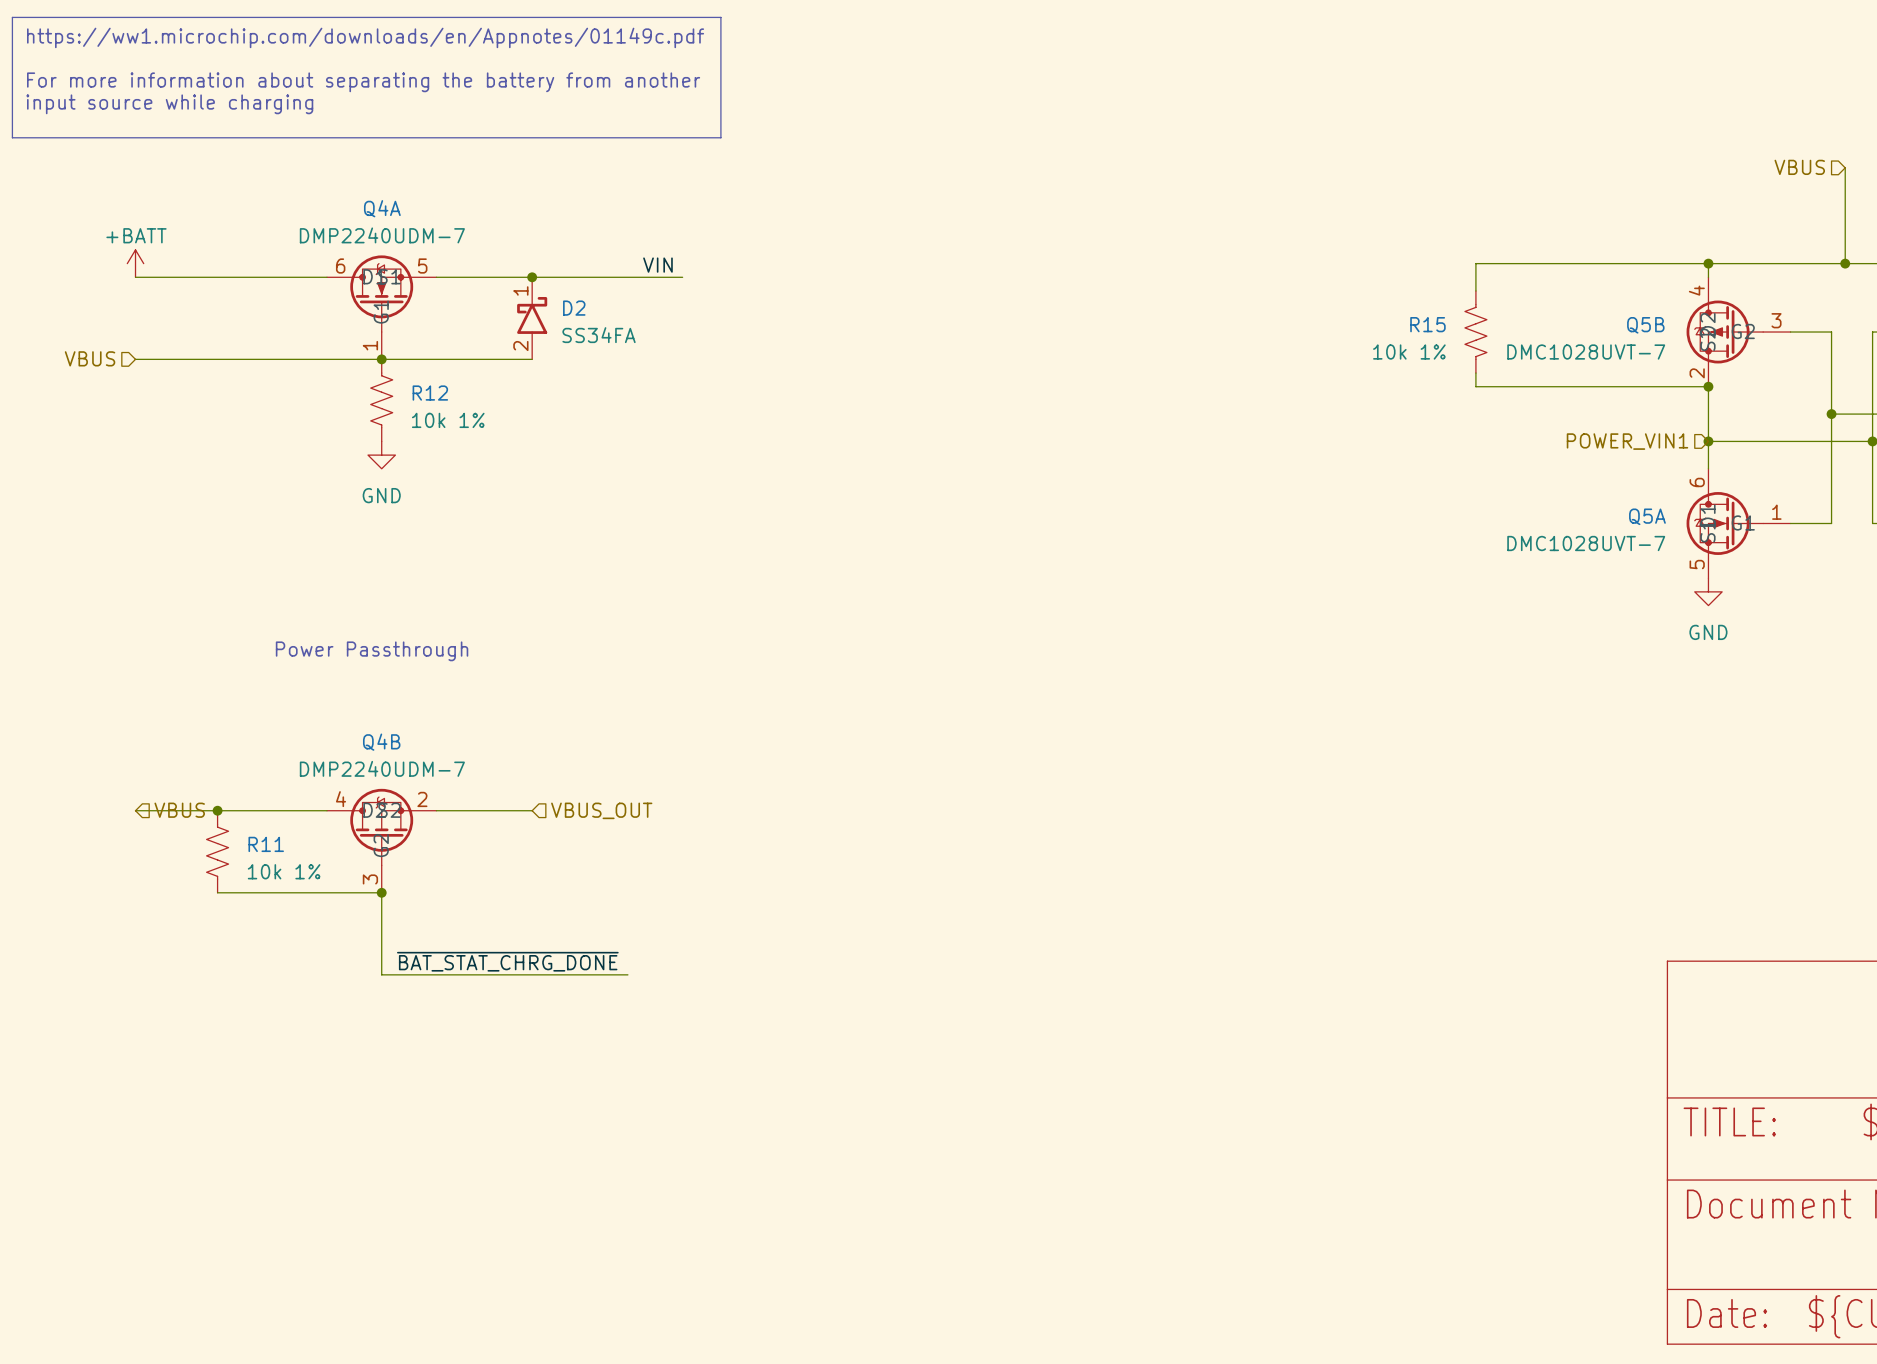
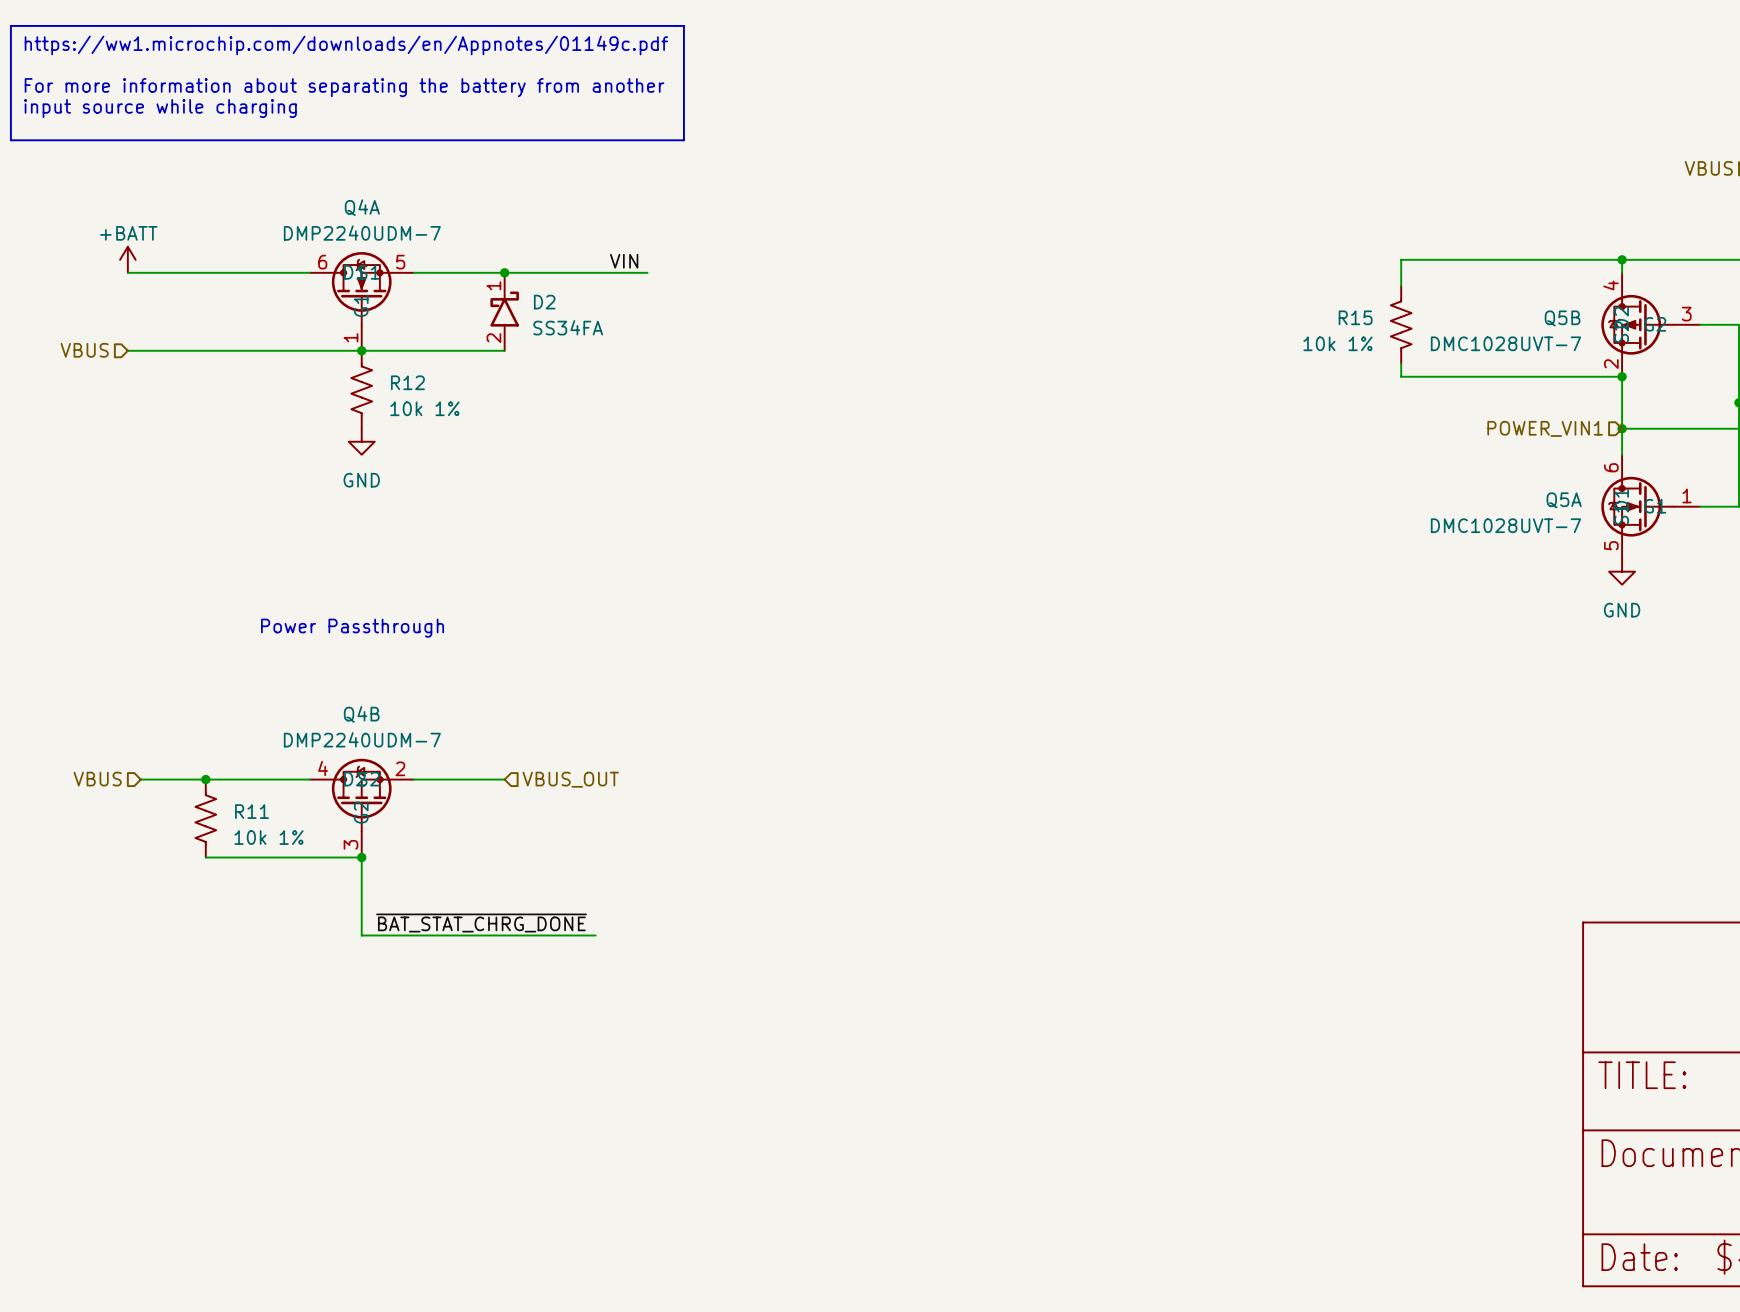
wire: (135, 810) (149, 810) -> none
hierarchical label rotation: 0° (179, 810) -> 180° (97, 779)
hierarchical label position: VBUS (179, 810) -> VBUS (97, 779)

